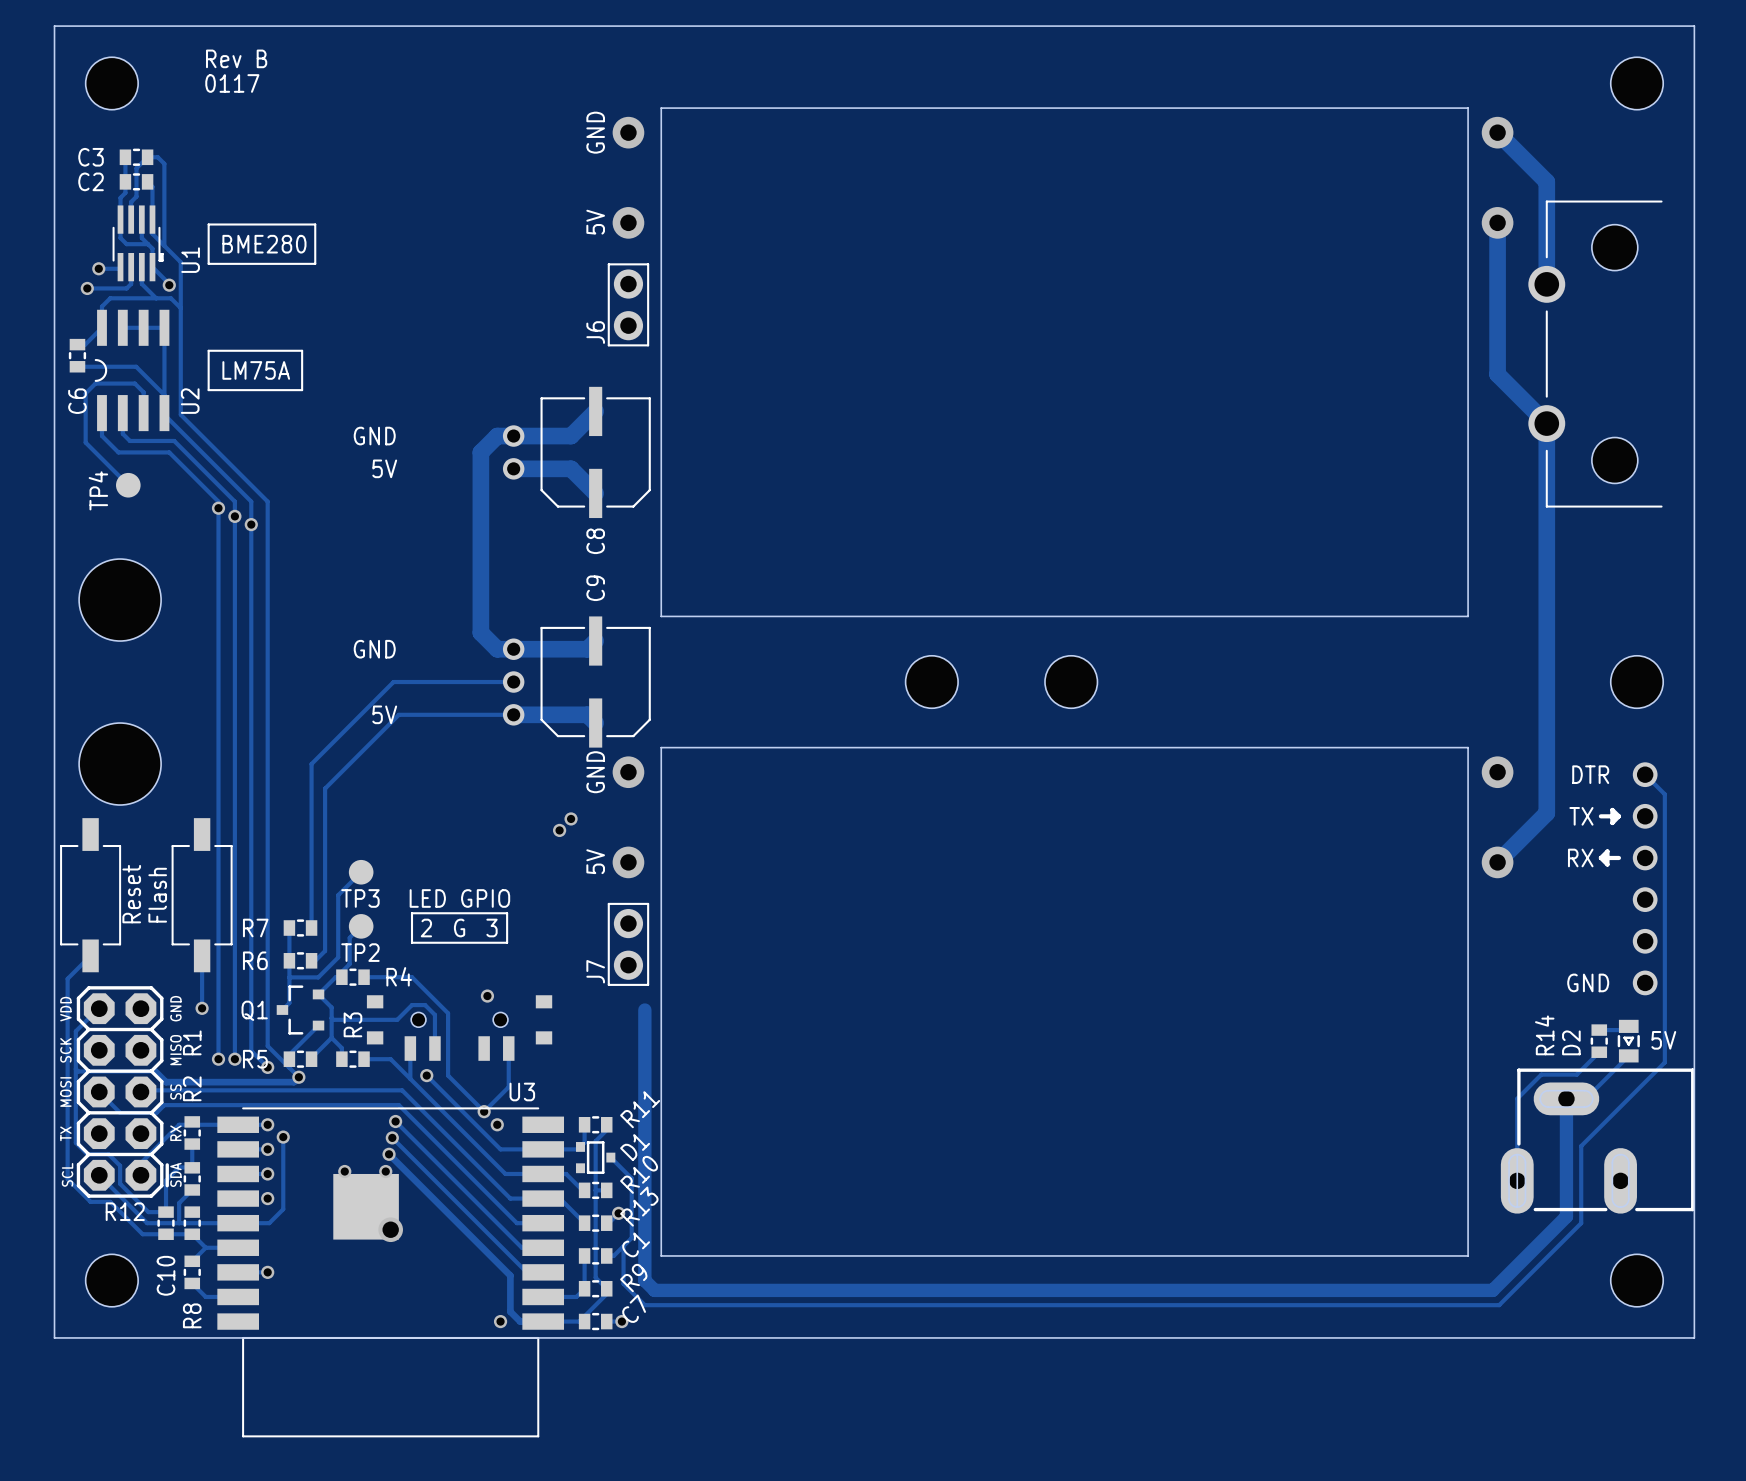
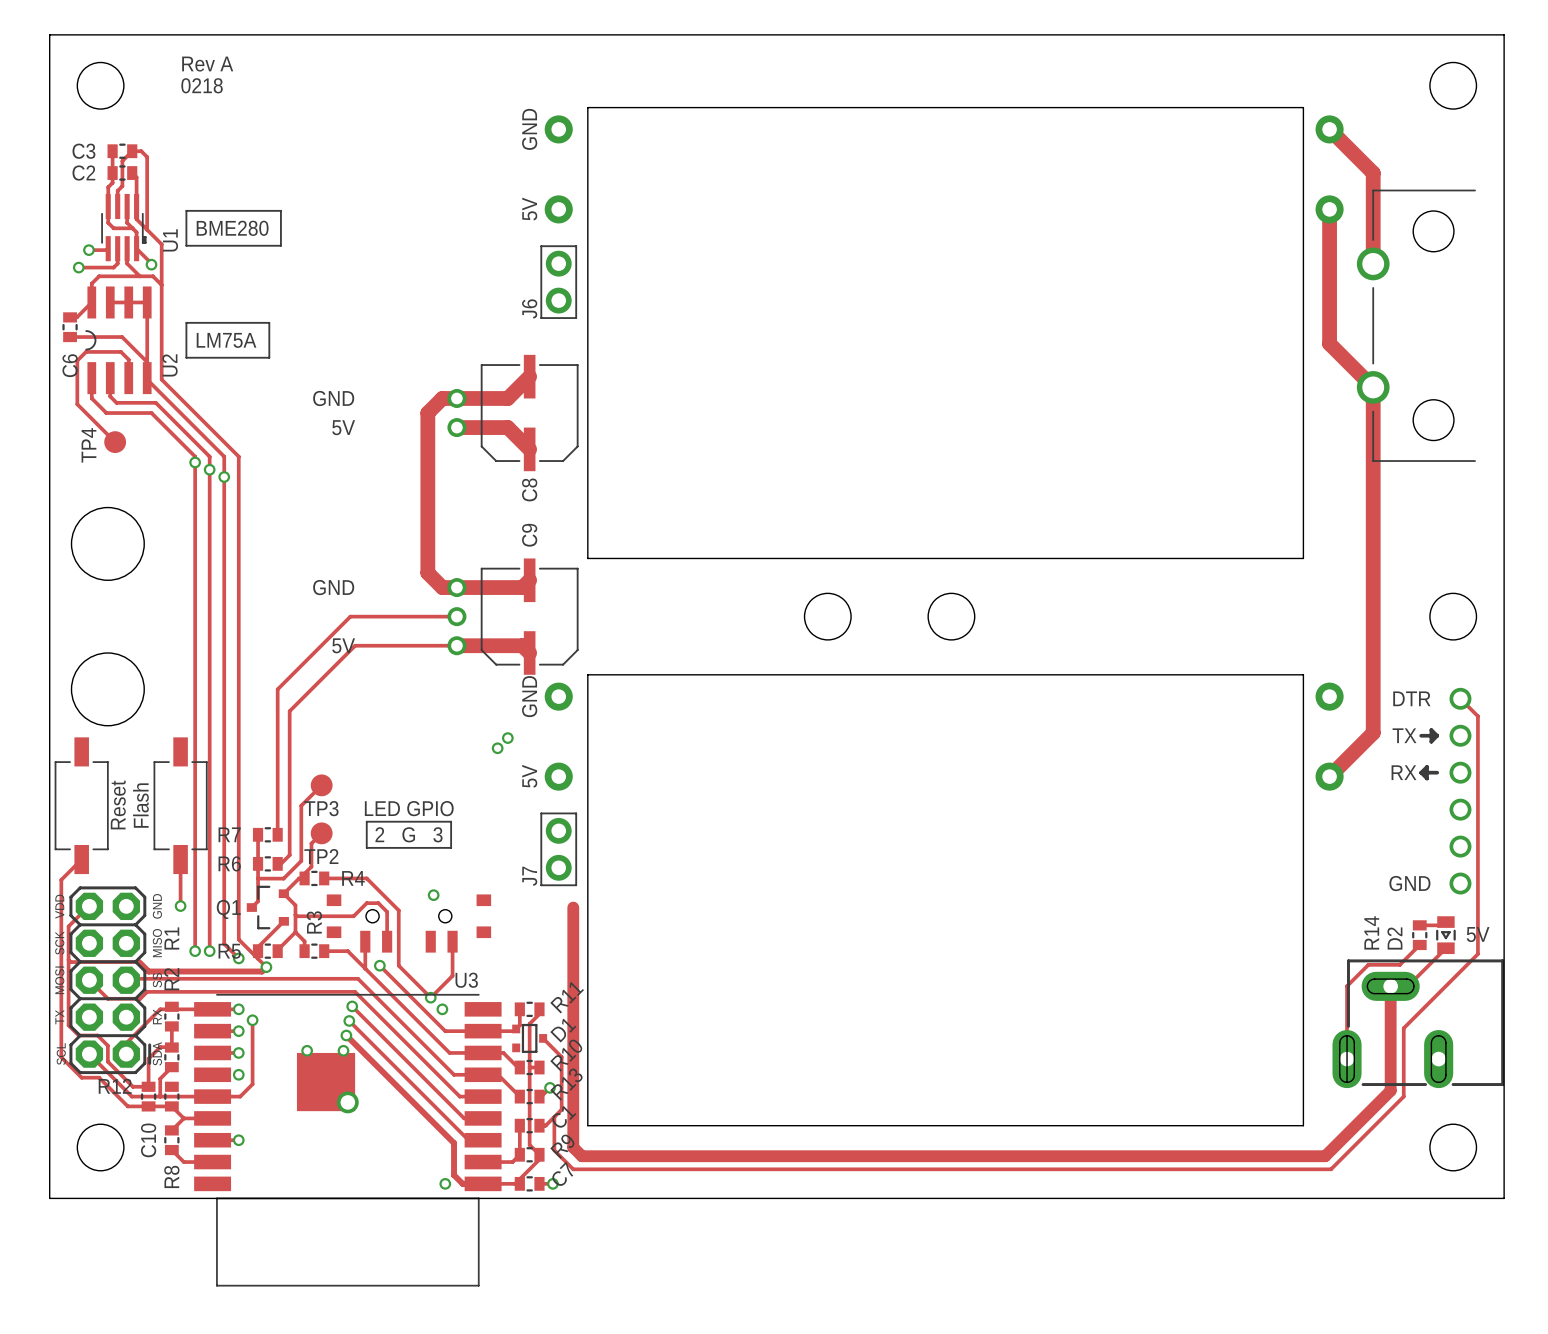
text: Rev B (236, 58) -> Rev A (207, 64)
text: 0117 (232, 83) -> 0218 (202, 85)

